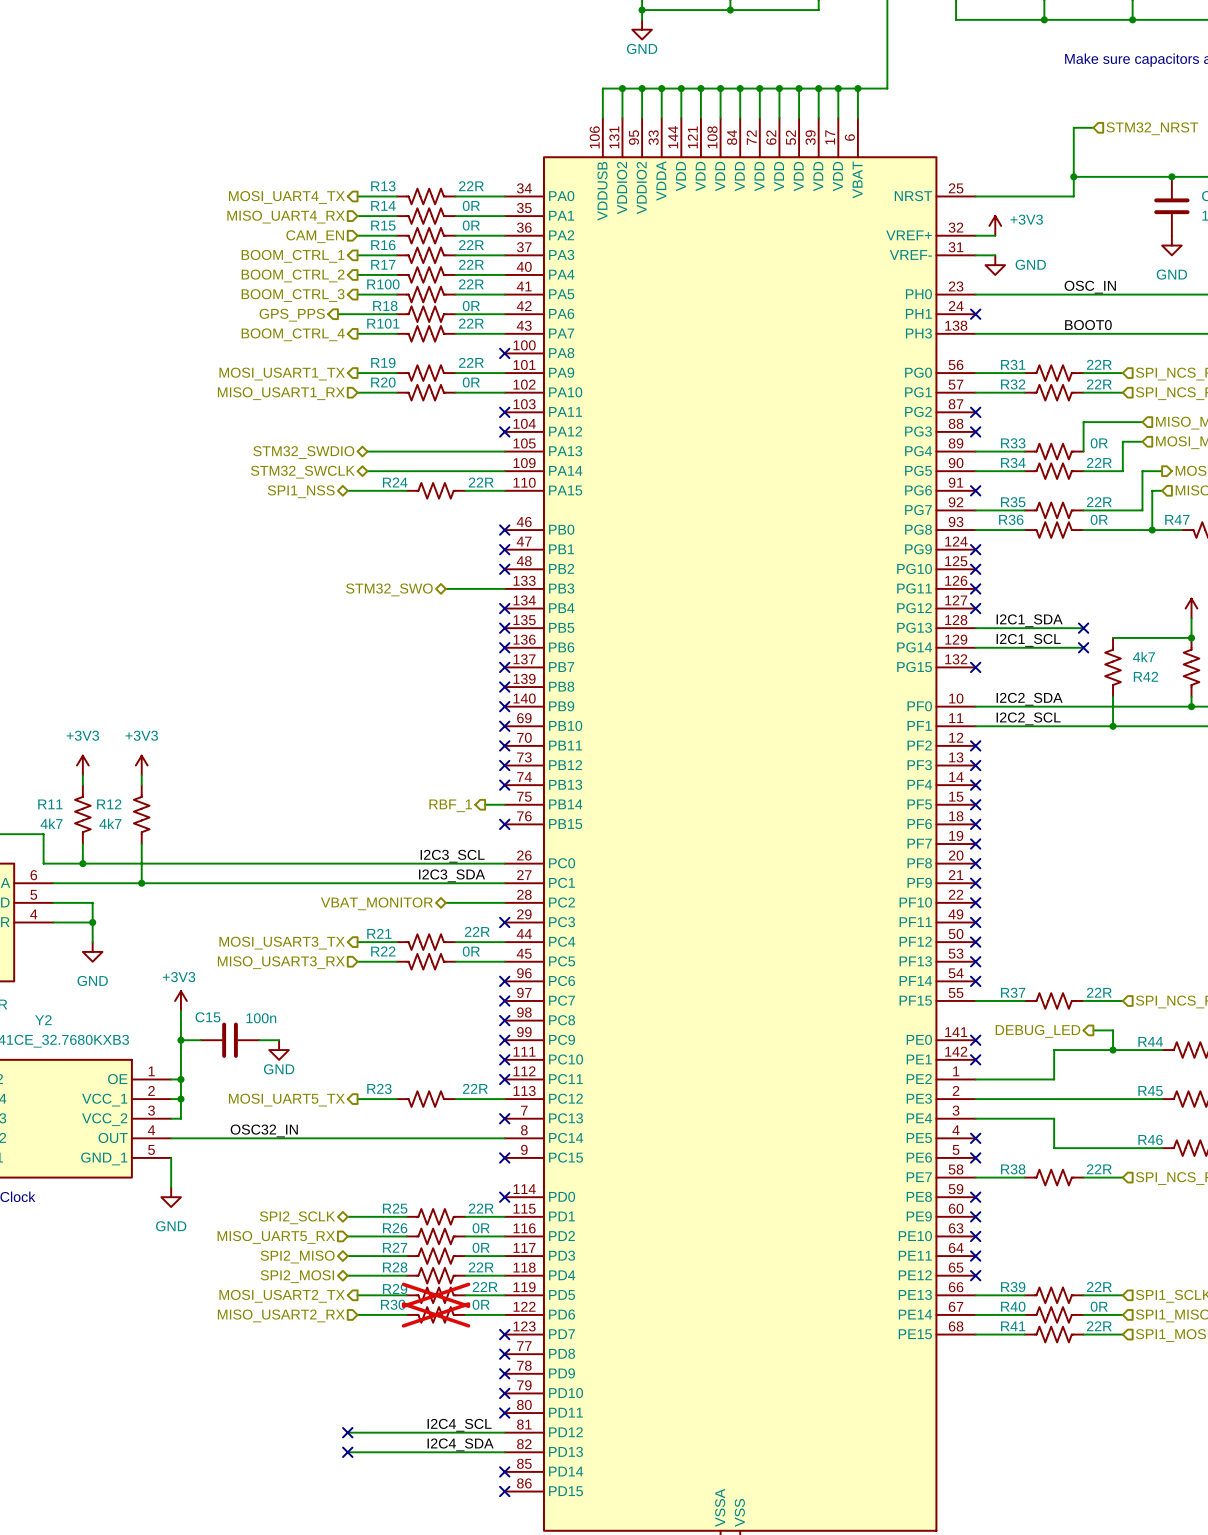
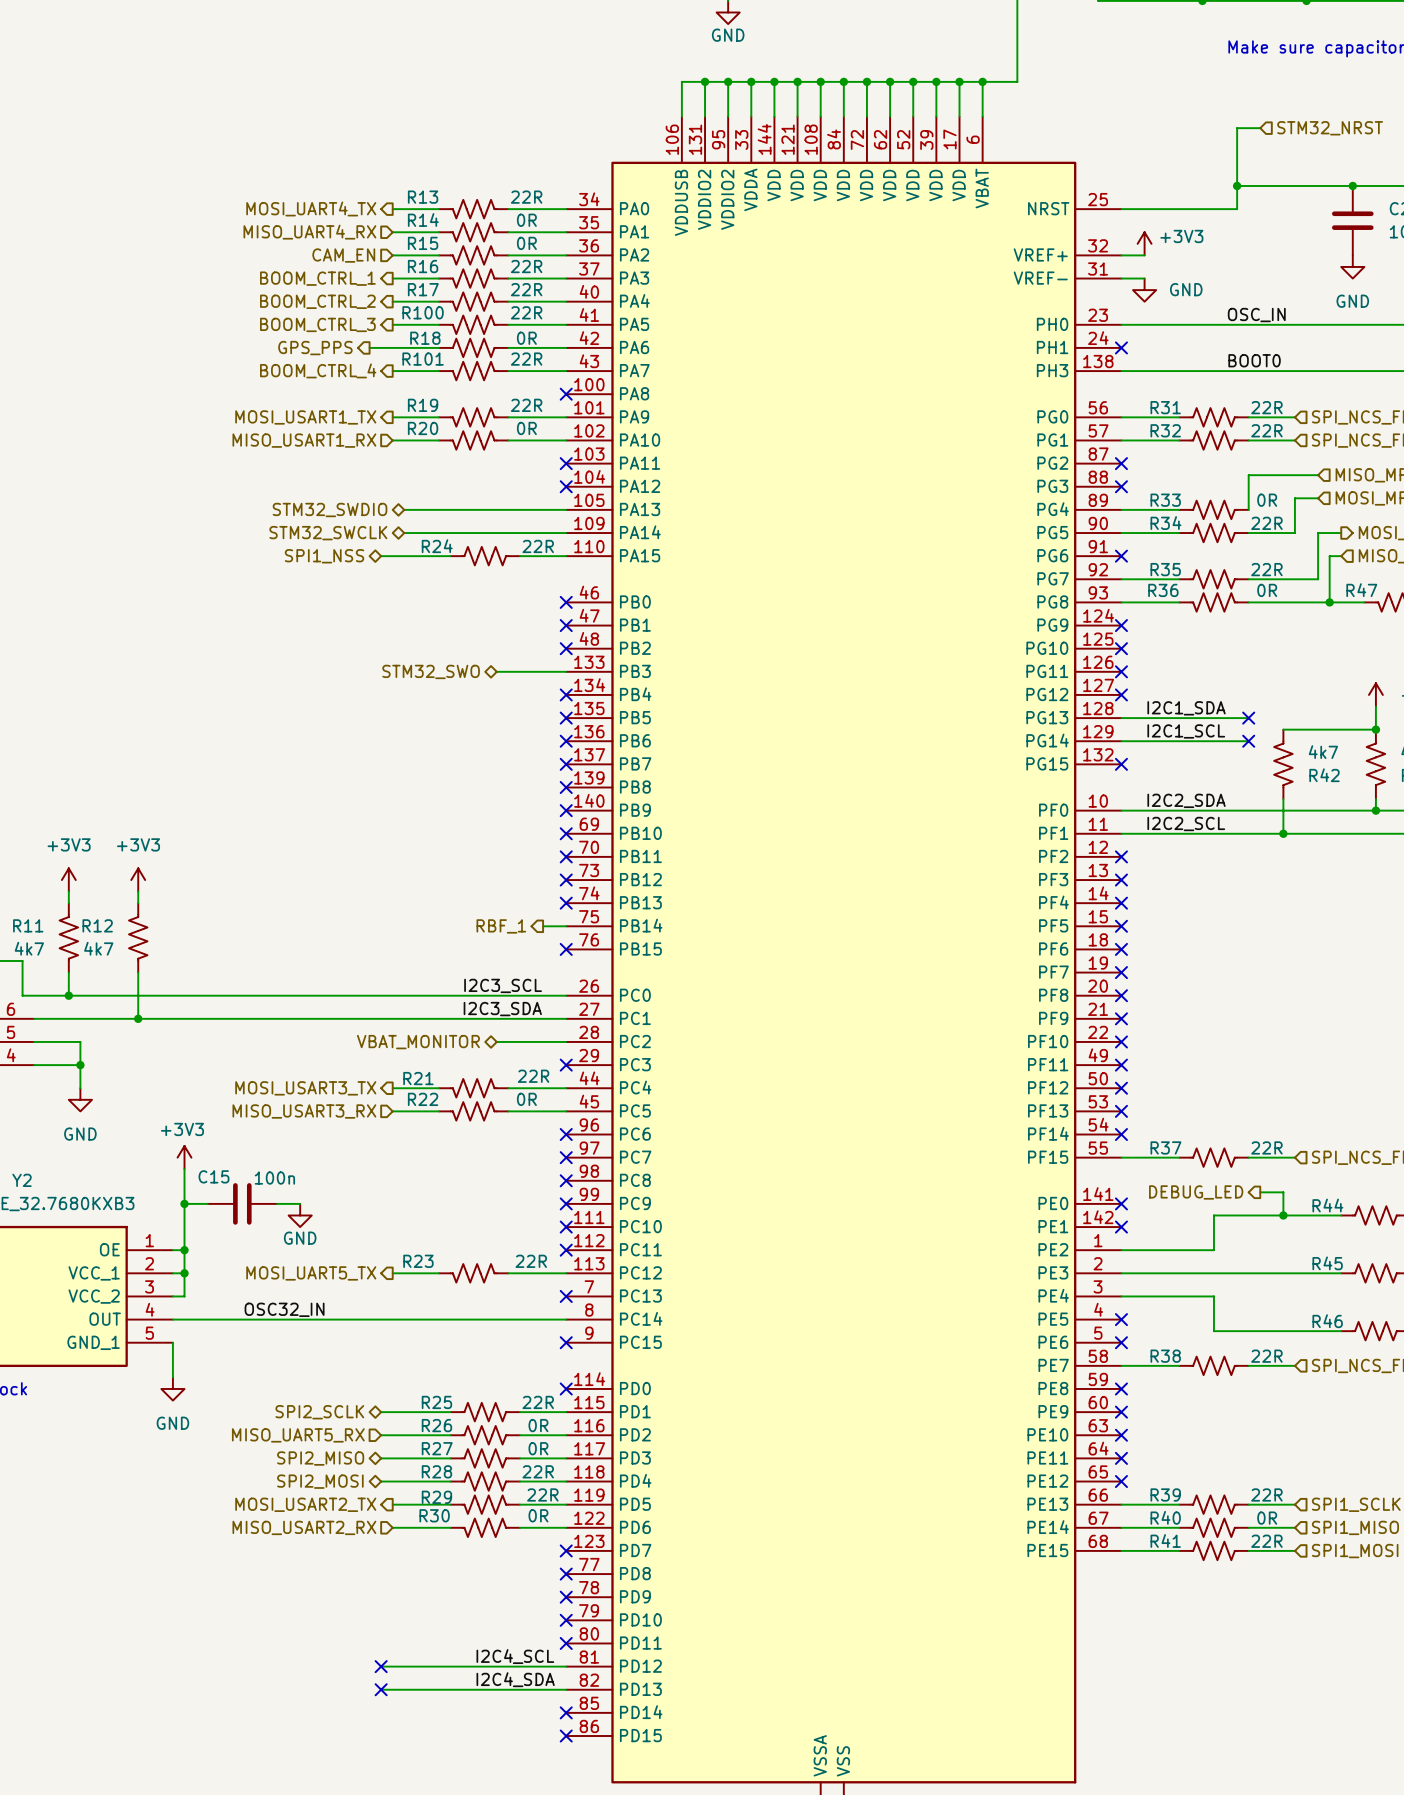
R29 do-not-place cross: (436, 1295) -> none
R30 do-not-place cross: (436, 1314) -> none

